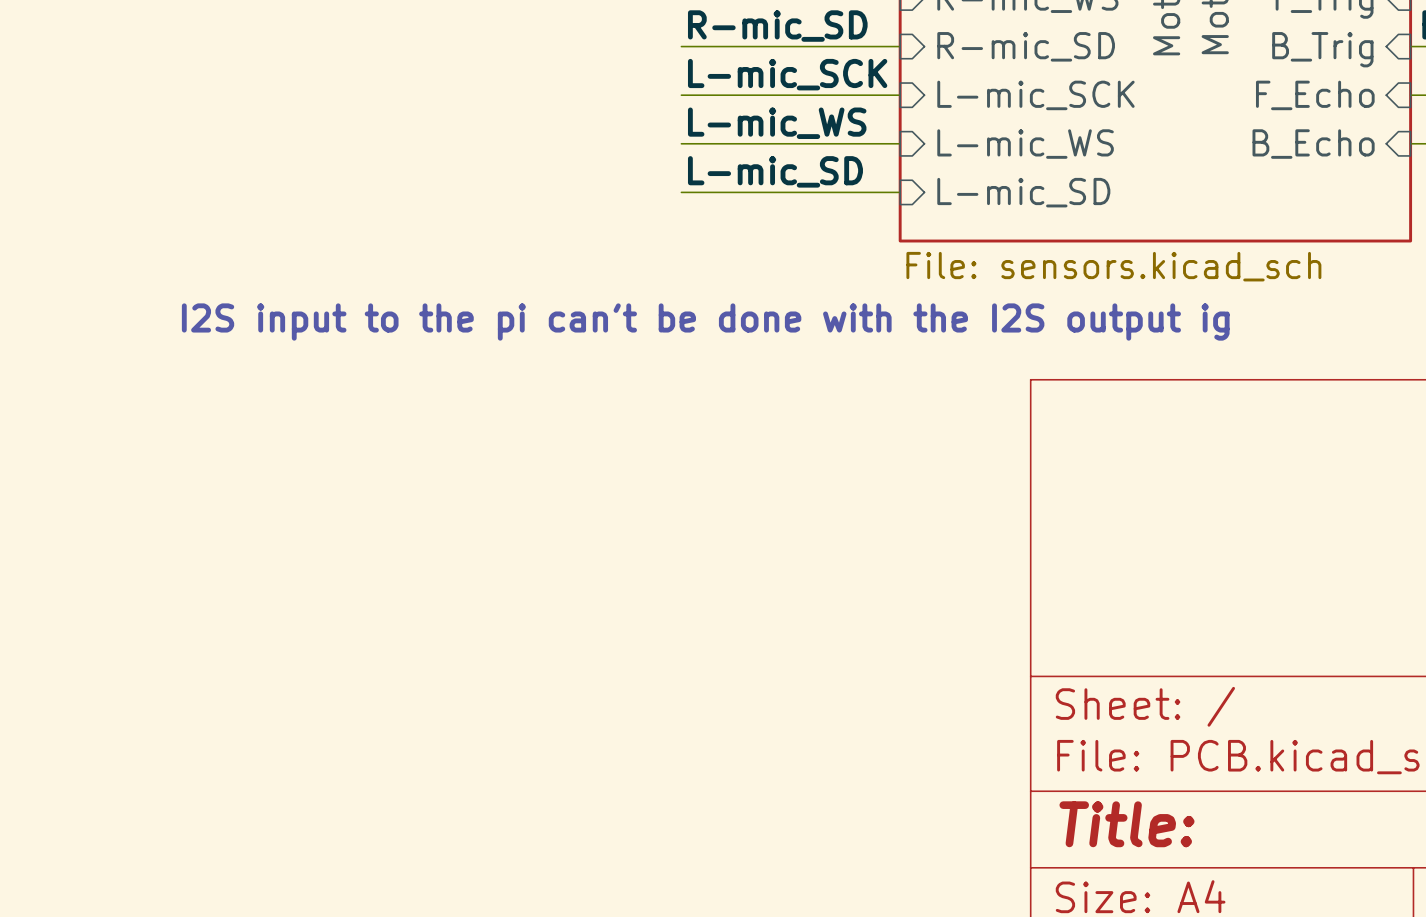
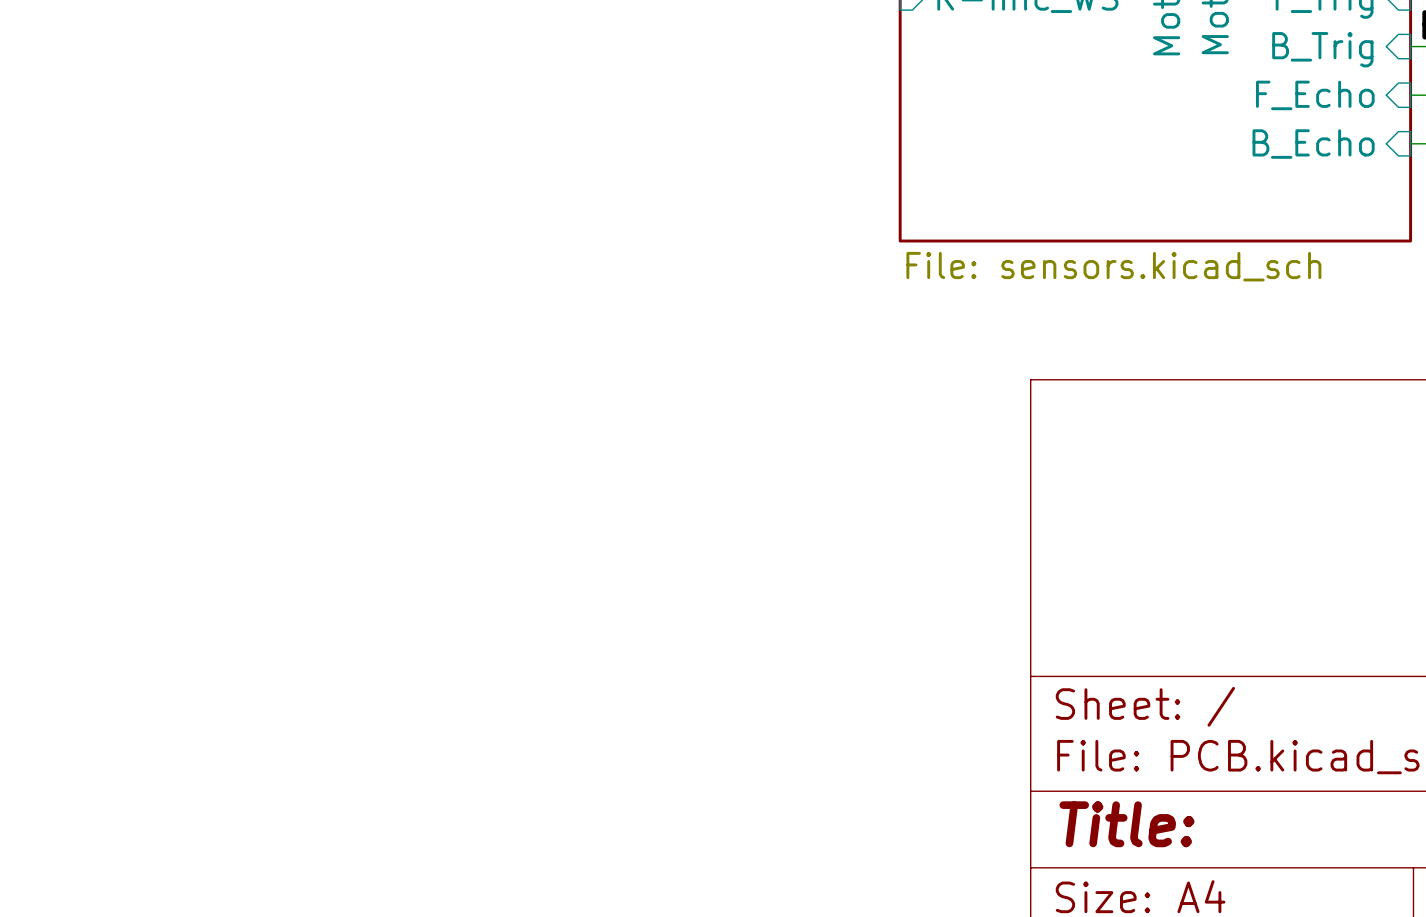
label: R-mic_SD (777, 26) -> none
wire: (681, 46) (900, 46) -> none
sheet pin: R-mic_SD (1026, 46) -> none
label: L-mic_SCK (787, 74) -> none
wire: (681, 95) (900, 95) -> none
sheet pin: L-mic_SCK (1035, 95) -> none
label: L-mic_WS (777, 123) -> none
wire: (681, 143) (900, 143) -> none
sheet pin: L-mic_WS (1025, 144) -> none
label: L-mic_SD (775, 171) -> none
wire: (681, 192) (900, 192) -> none
sheet pin: L-mic_SD (1023, 192) -> none
text: I2S input to the pi can't be done with the I2S output ig (705, 322) -> none

